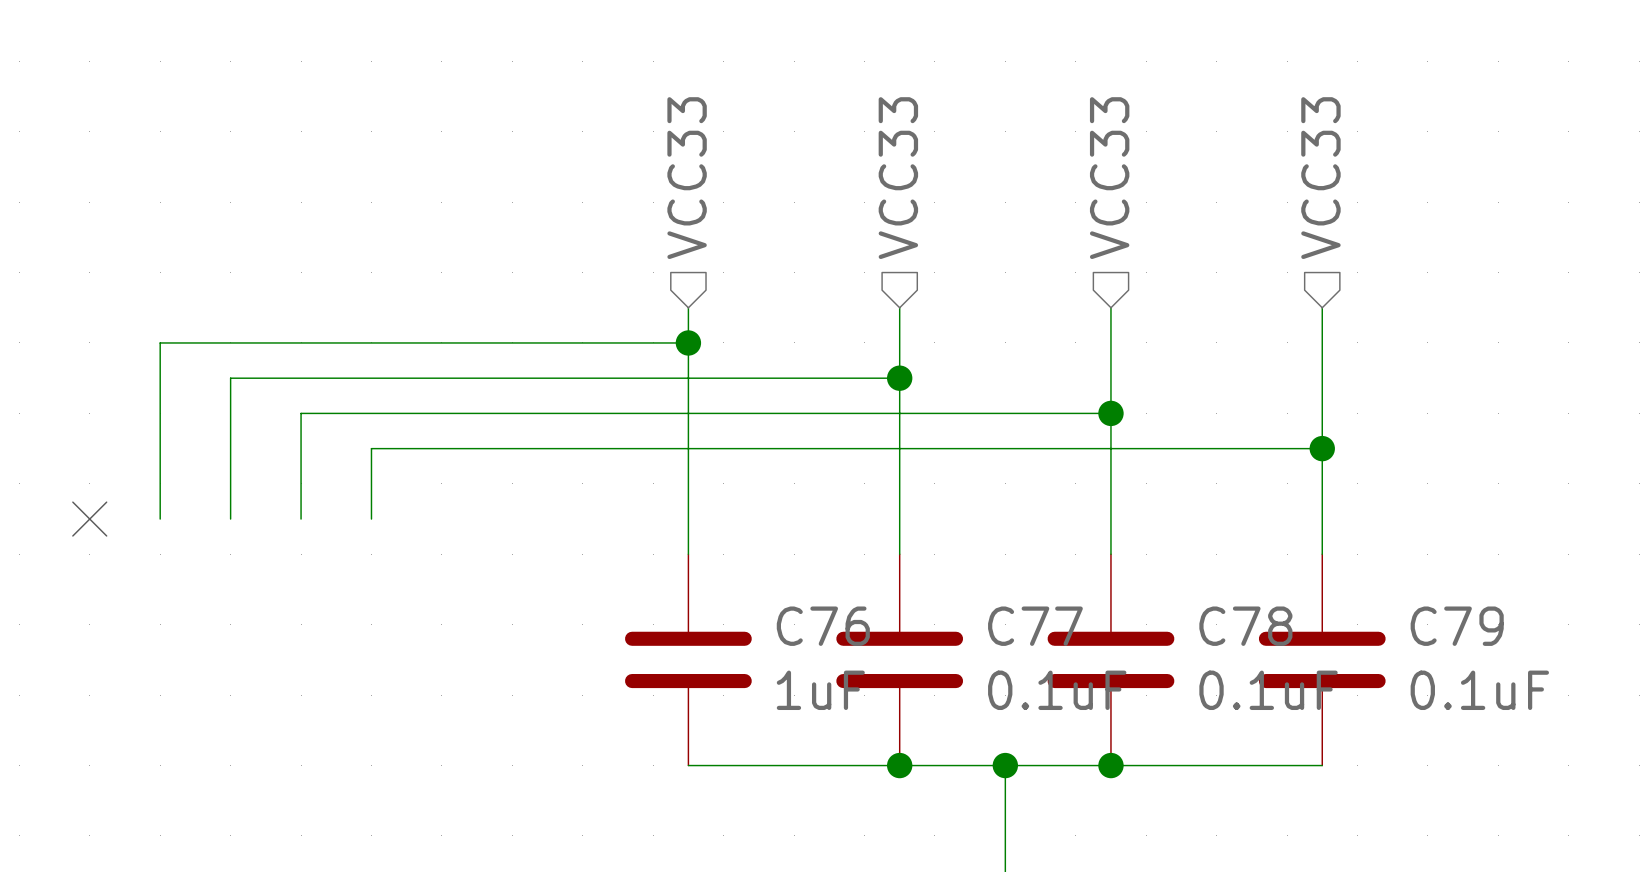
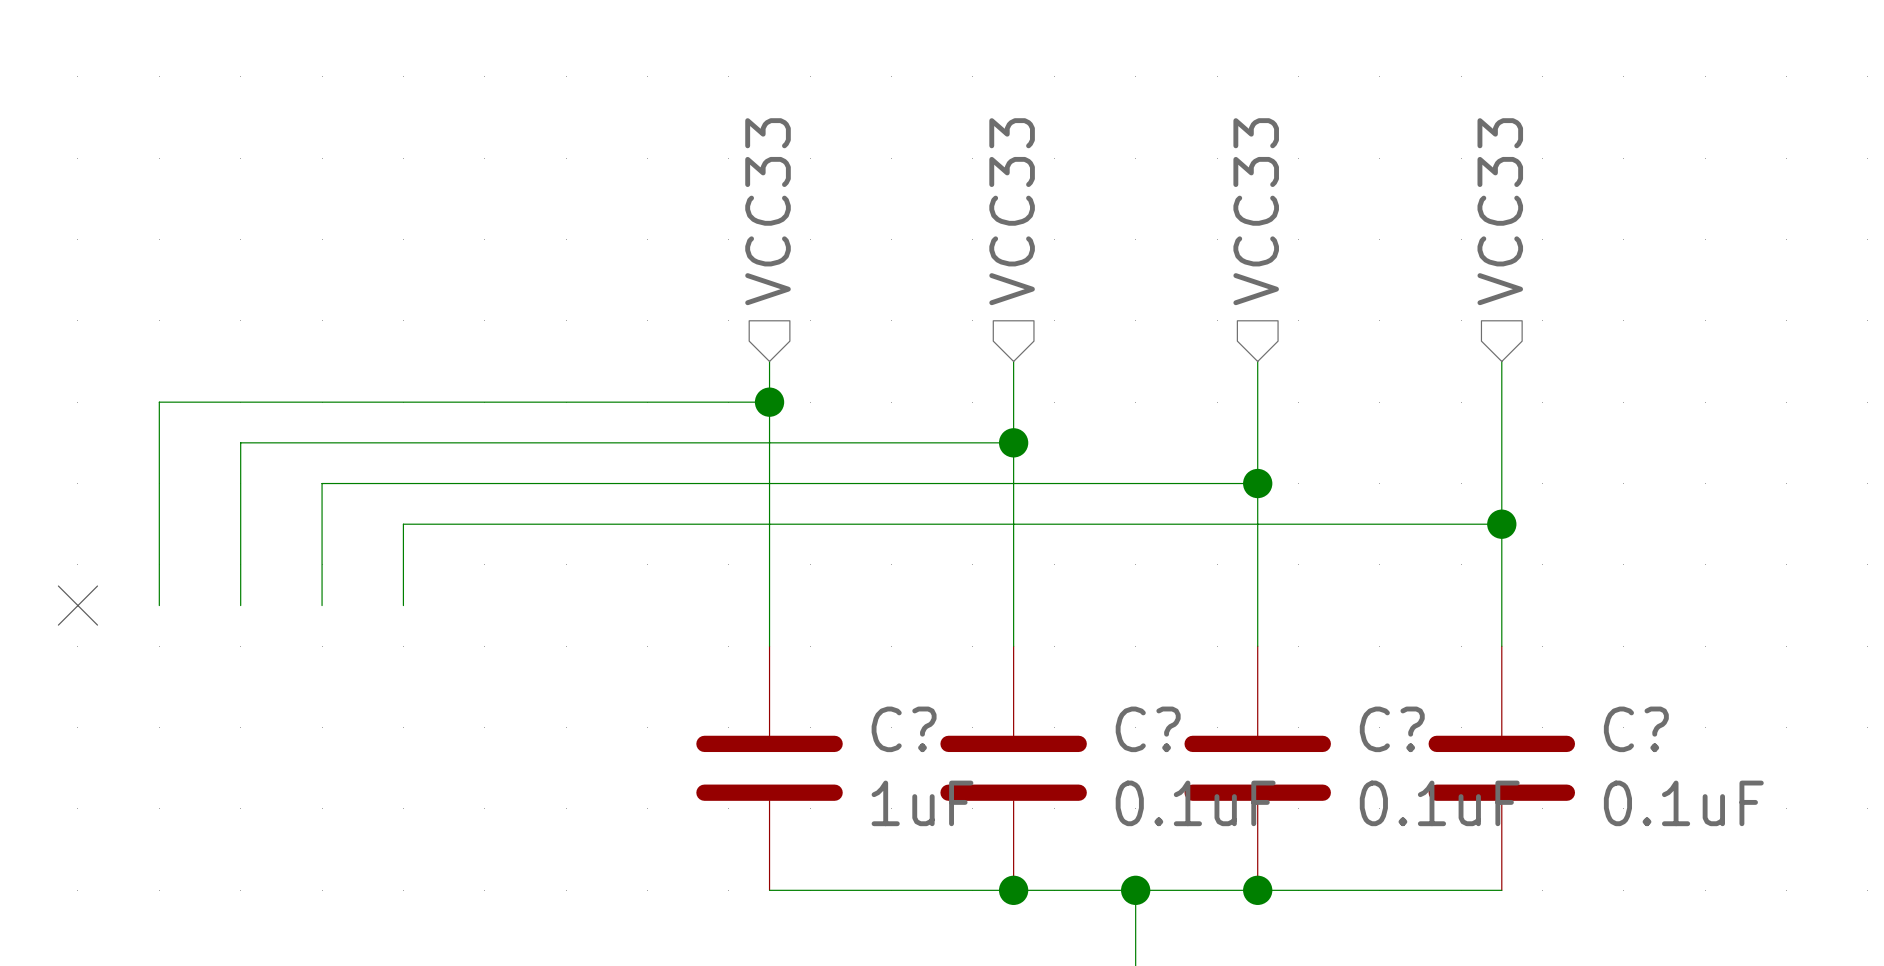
C76 name: C76 (823, 626) -> C? (904, 729)
C77 name: C77 (1035, 626) -> C? (1148, 729)
C78 name: C78 (1245, 626) -> C? (1392, 729)
C79 name: C79 (1457, 626) -> C? (1636, 729)

